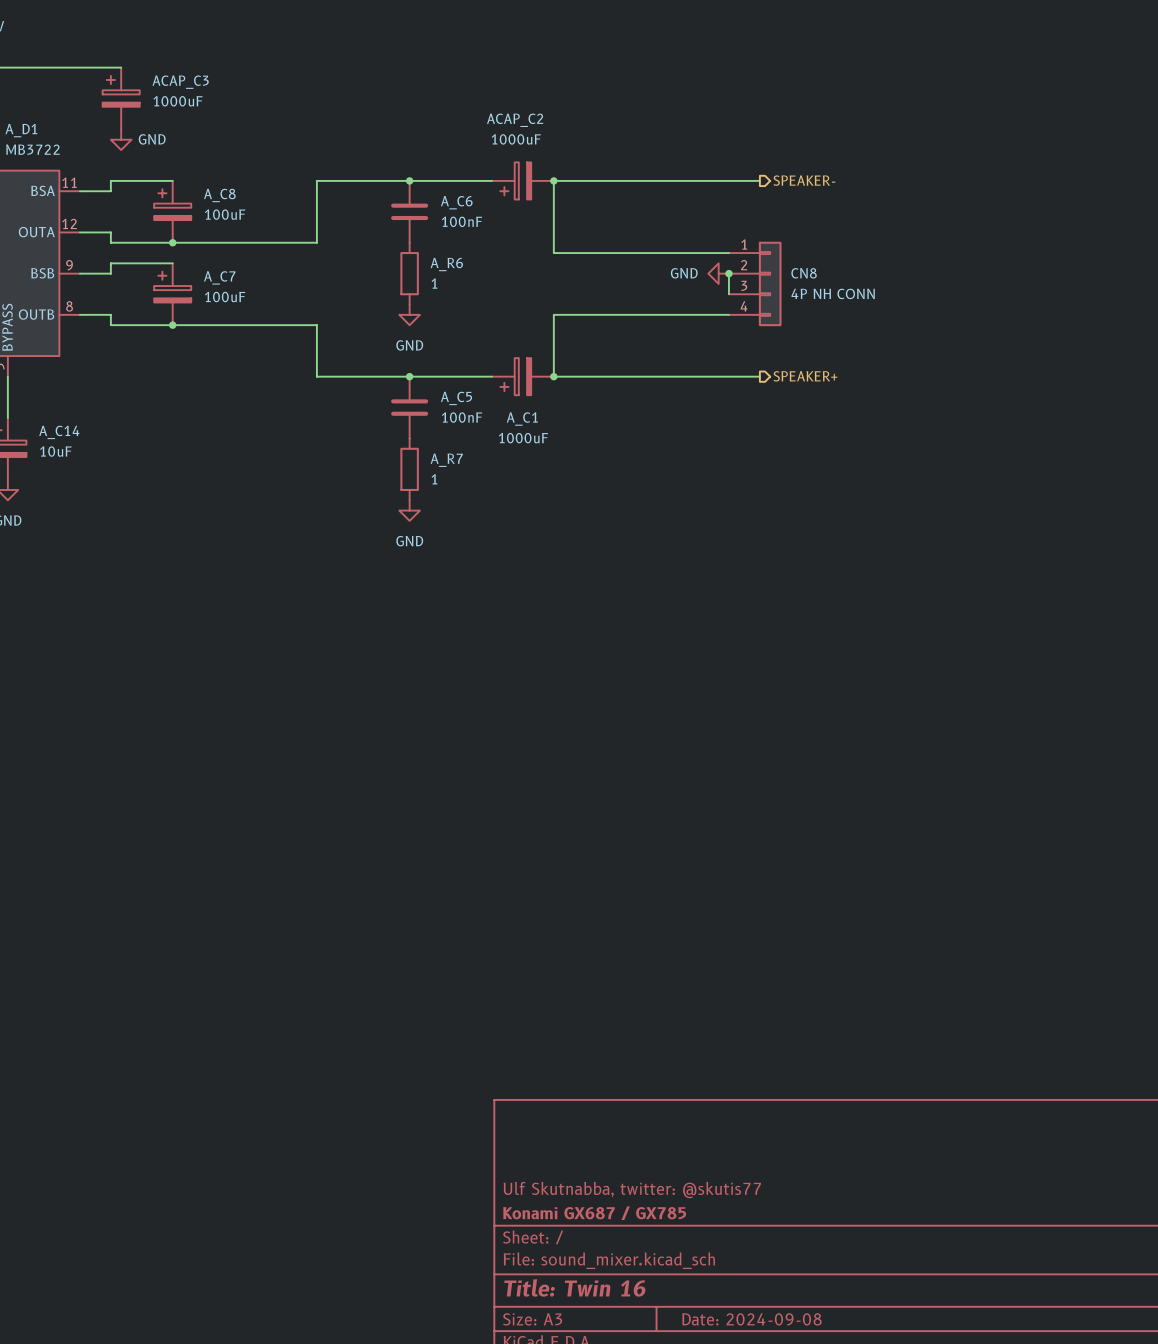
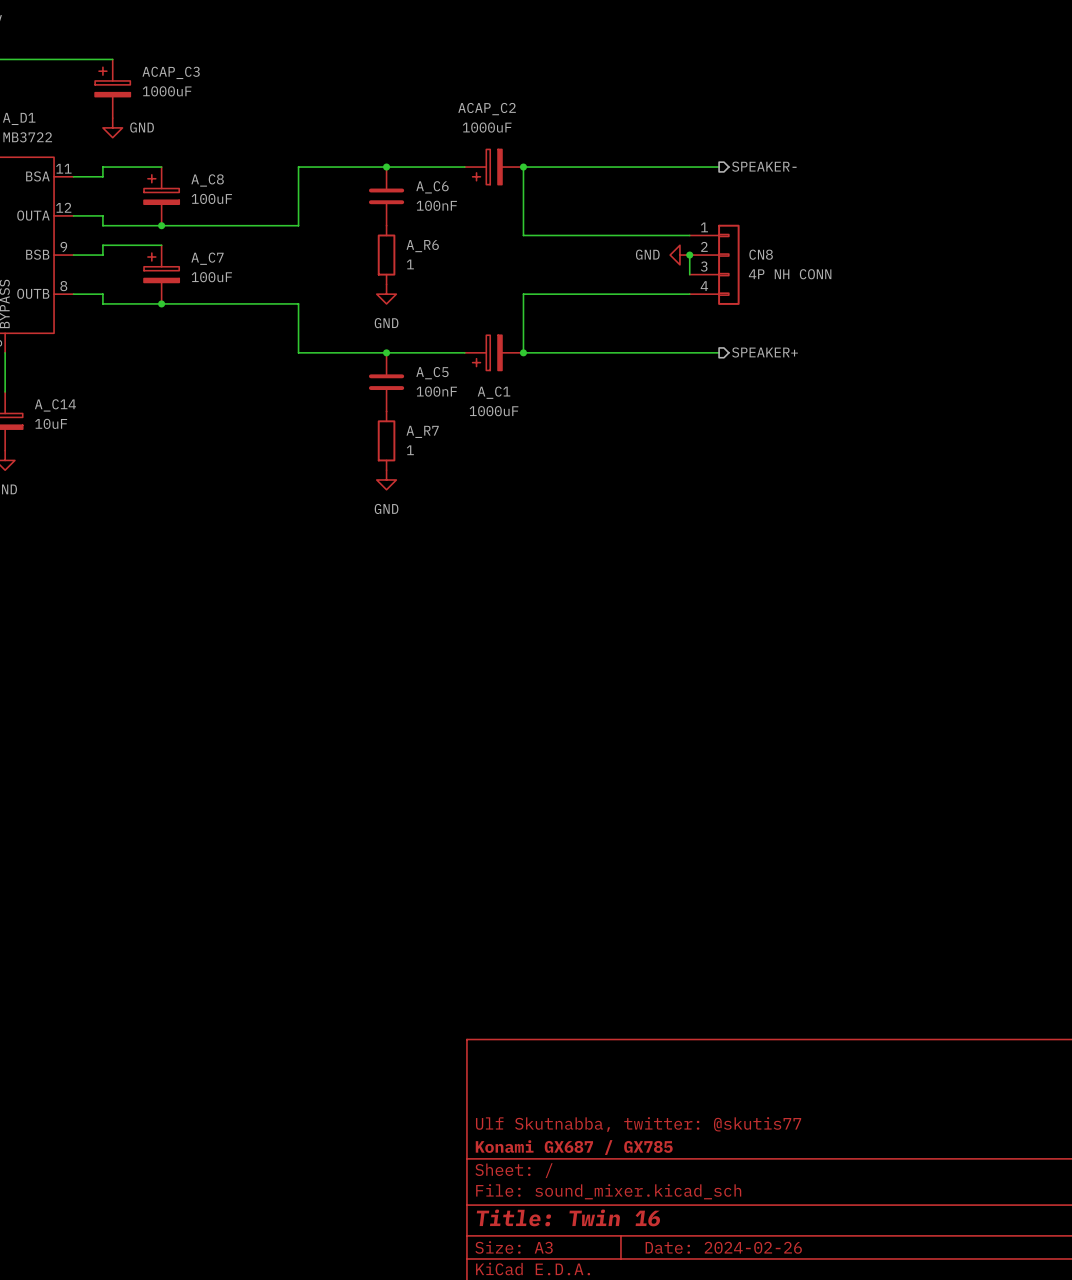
title block: Date: 2024-09-08 (751, 1319) -> Date: 2024-02-26 (723, 1247)

